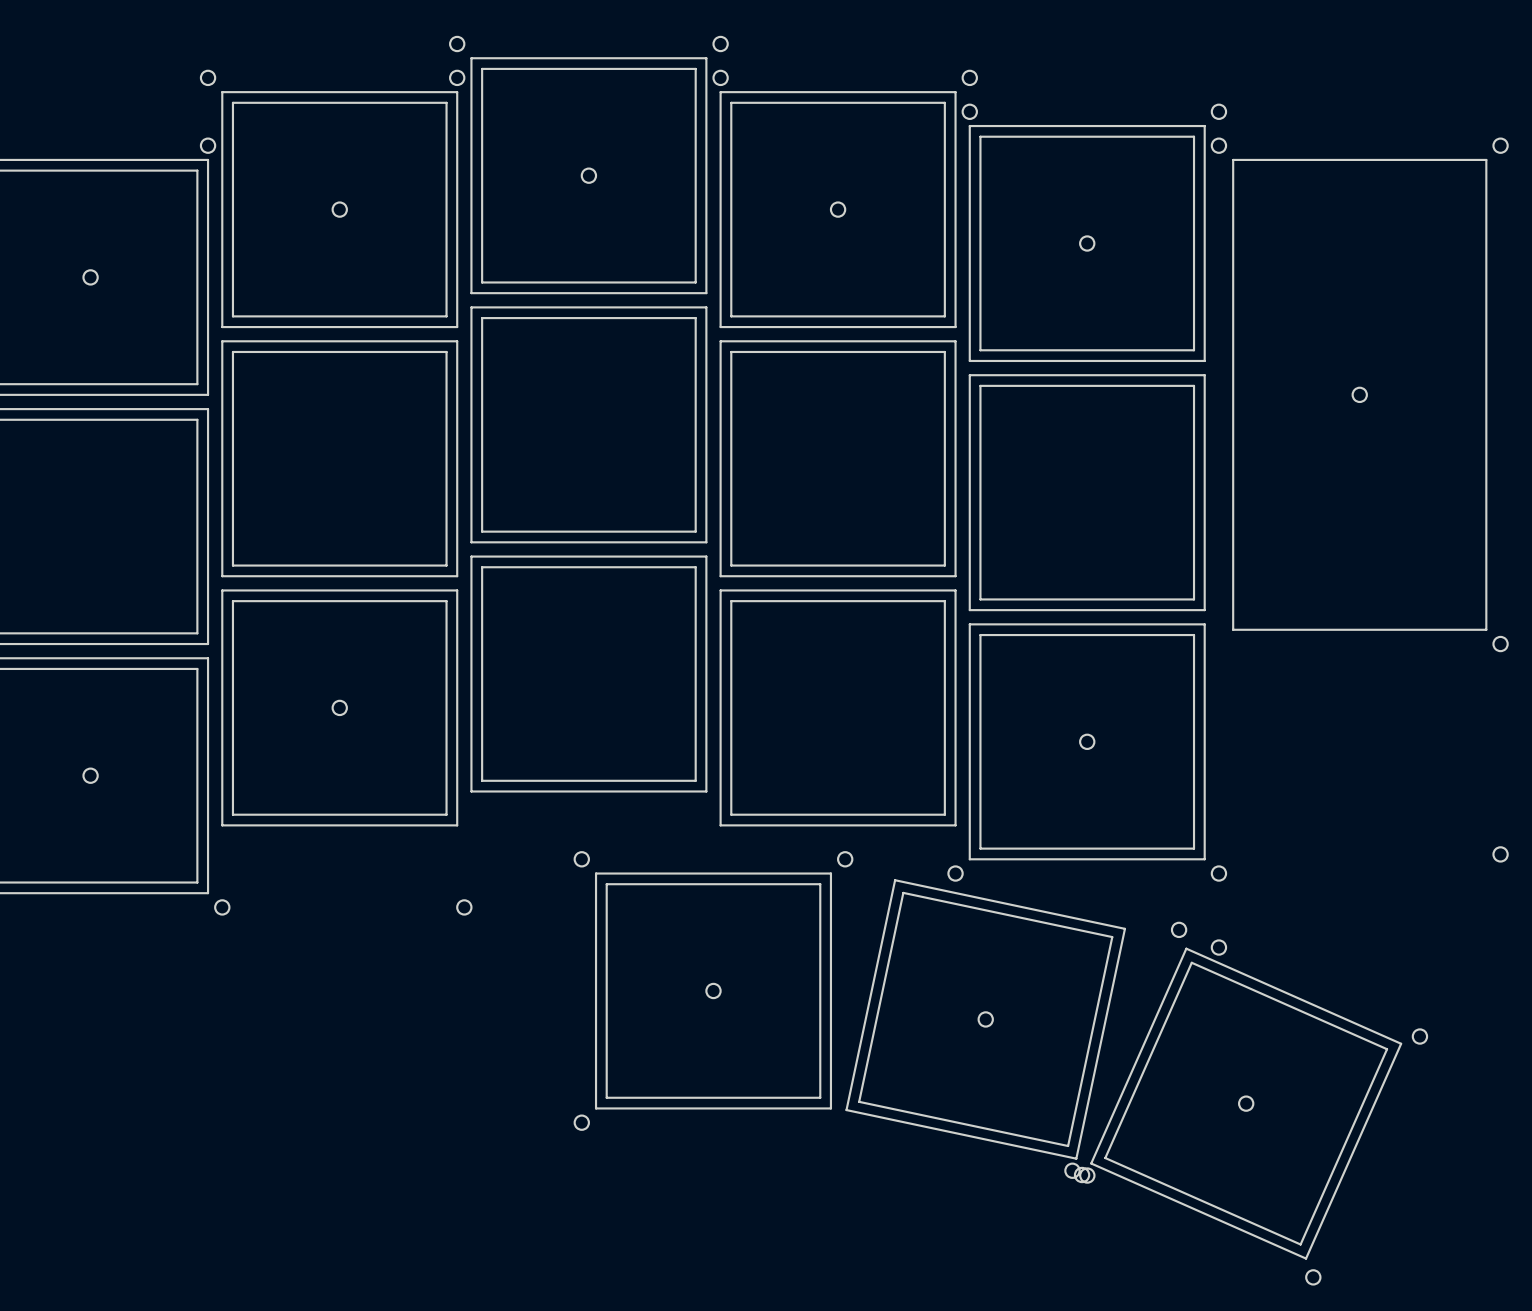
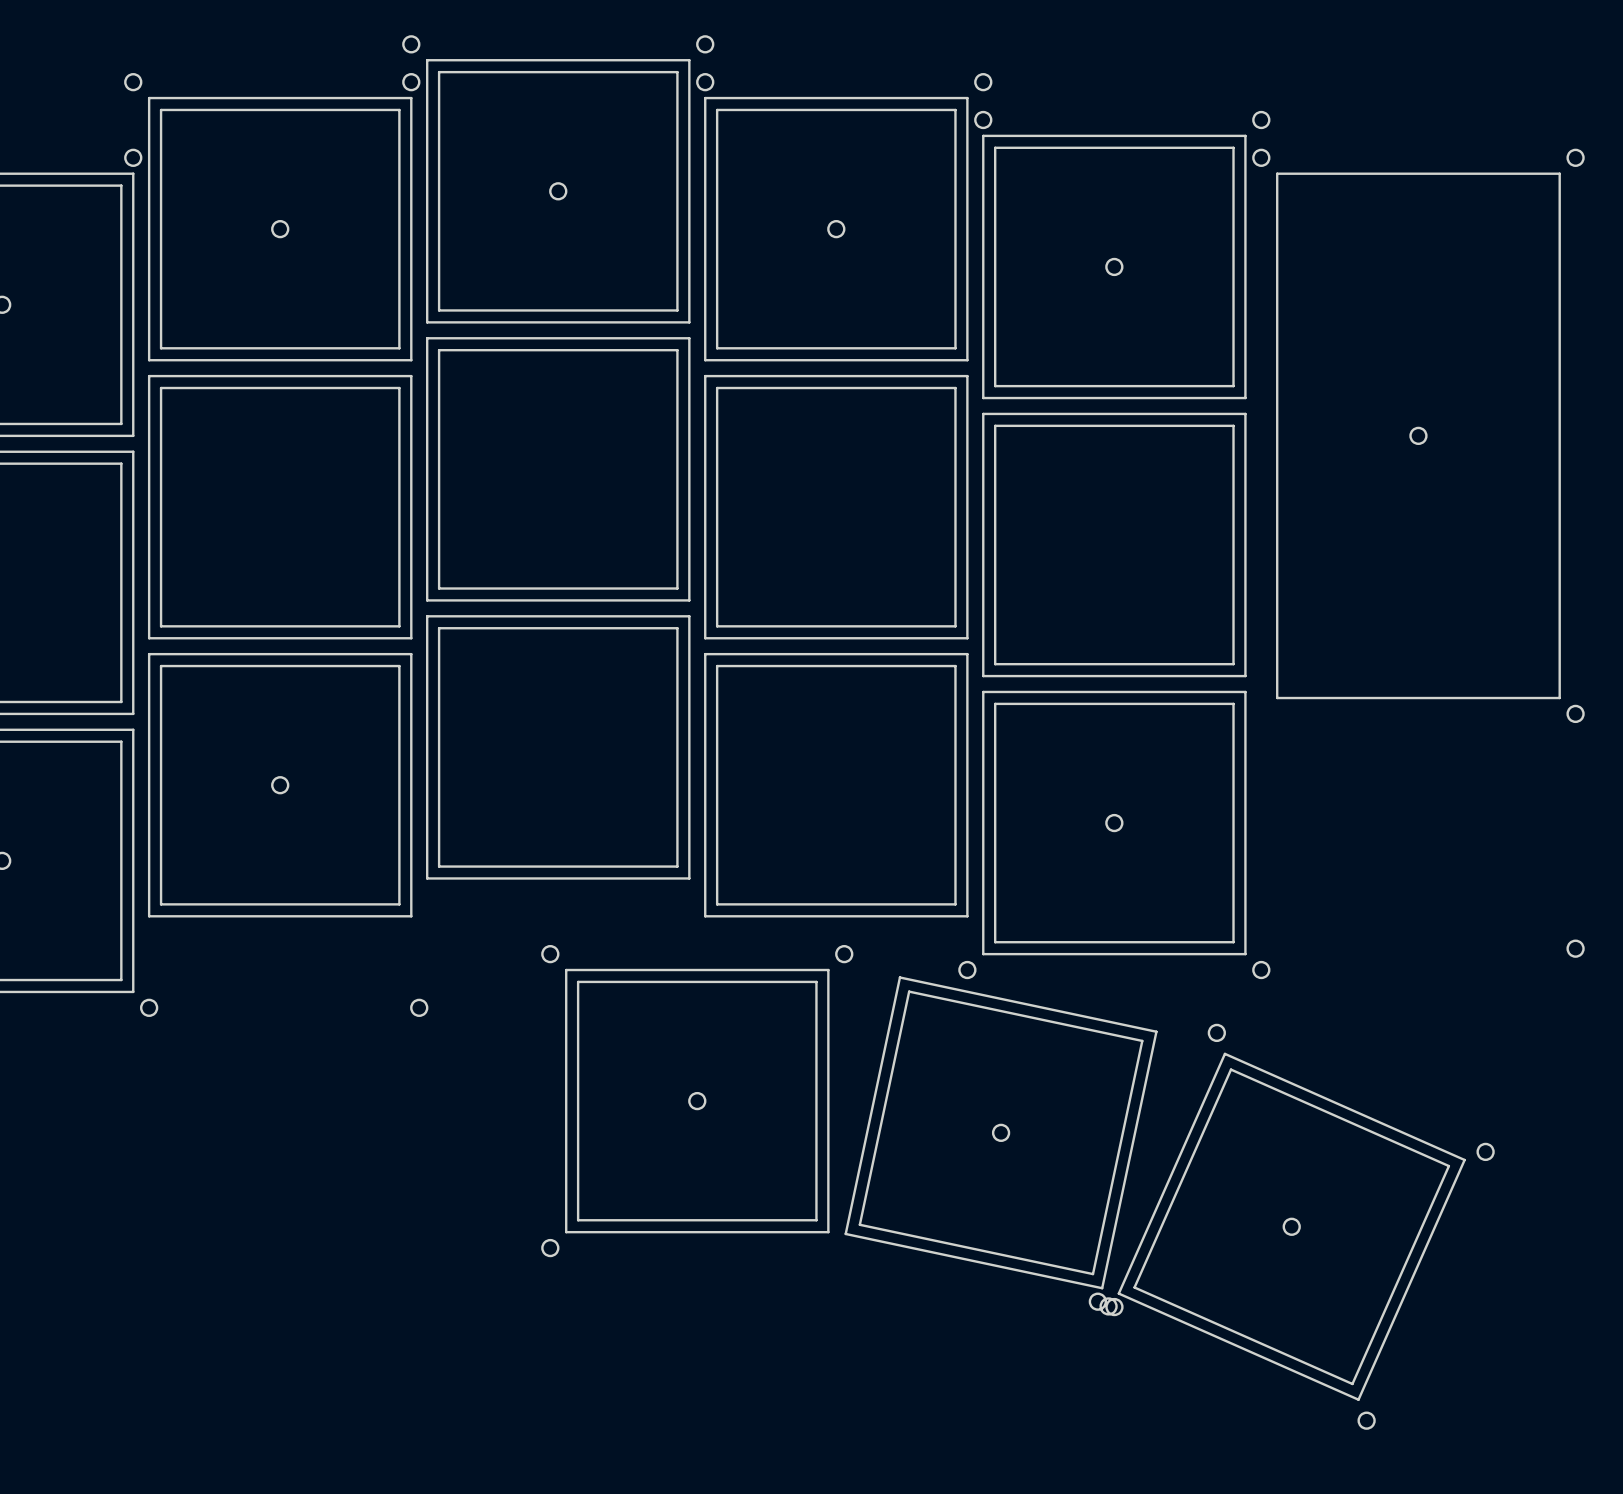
round board edge: [1210, 939, 1228, 956] -> none

